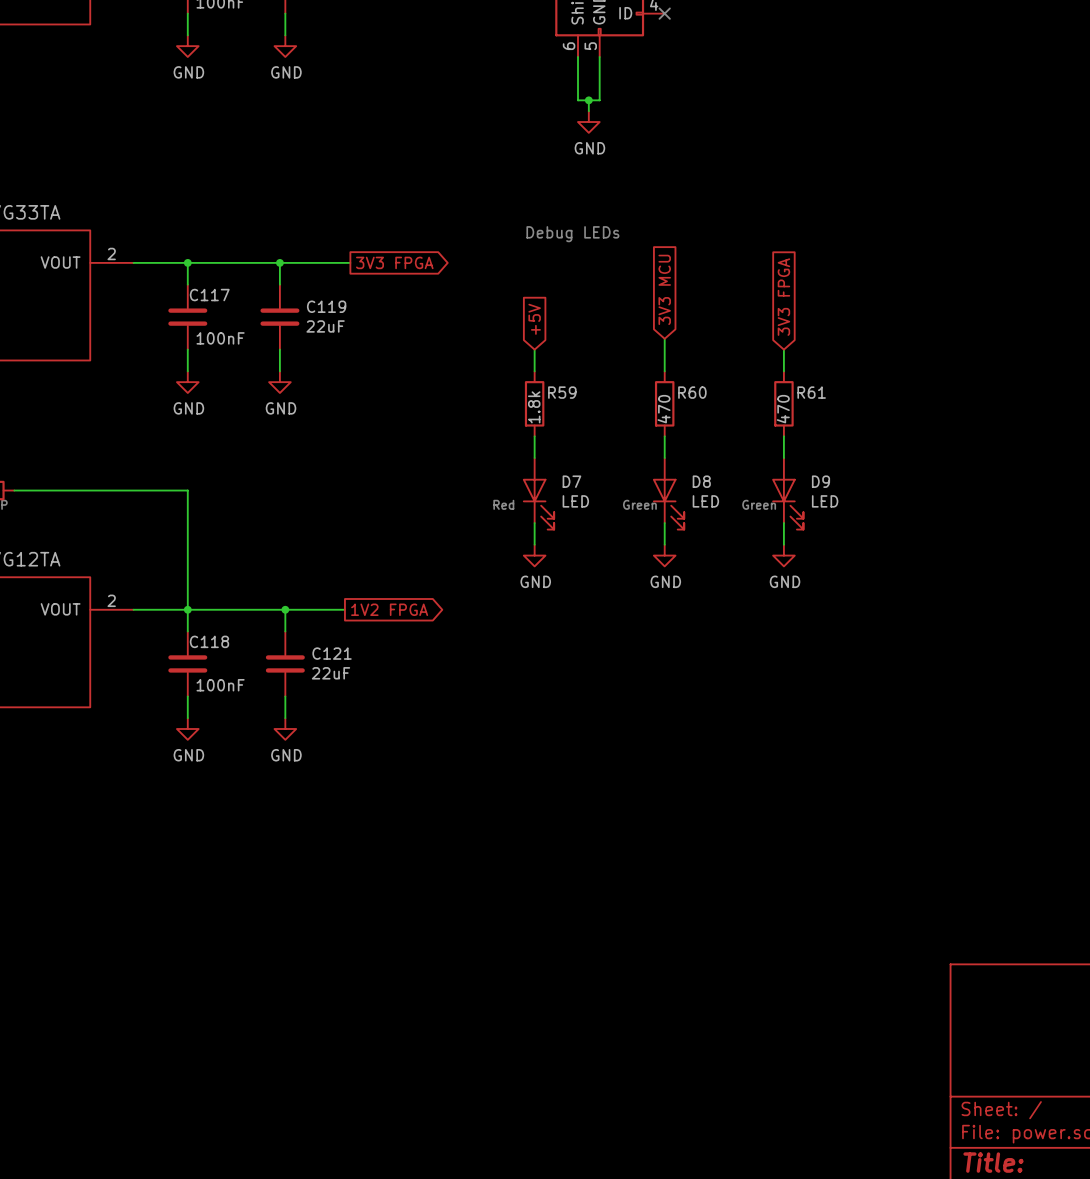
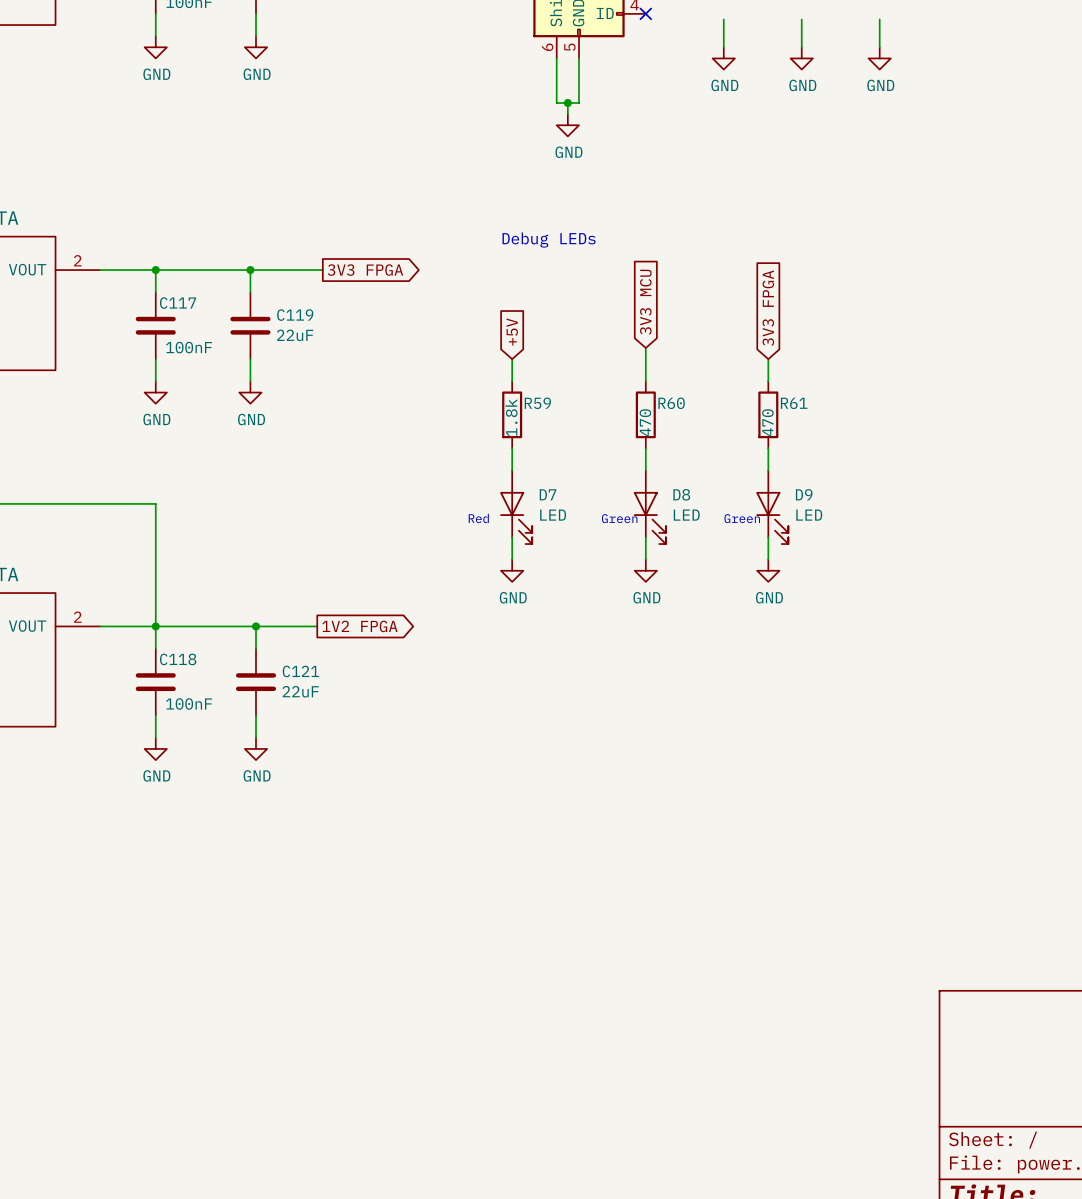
wire: none -> (723, 19) (723, 47)
wire: none -> (801, 19) (801, 47)
wire: none -> (879, 19) (879, 47)
power symbol: none -> GND (723, 58)
power symbol: none -> GND (801, 58)
power symbol: none -> GND (879, 58)

